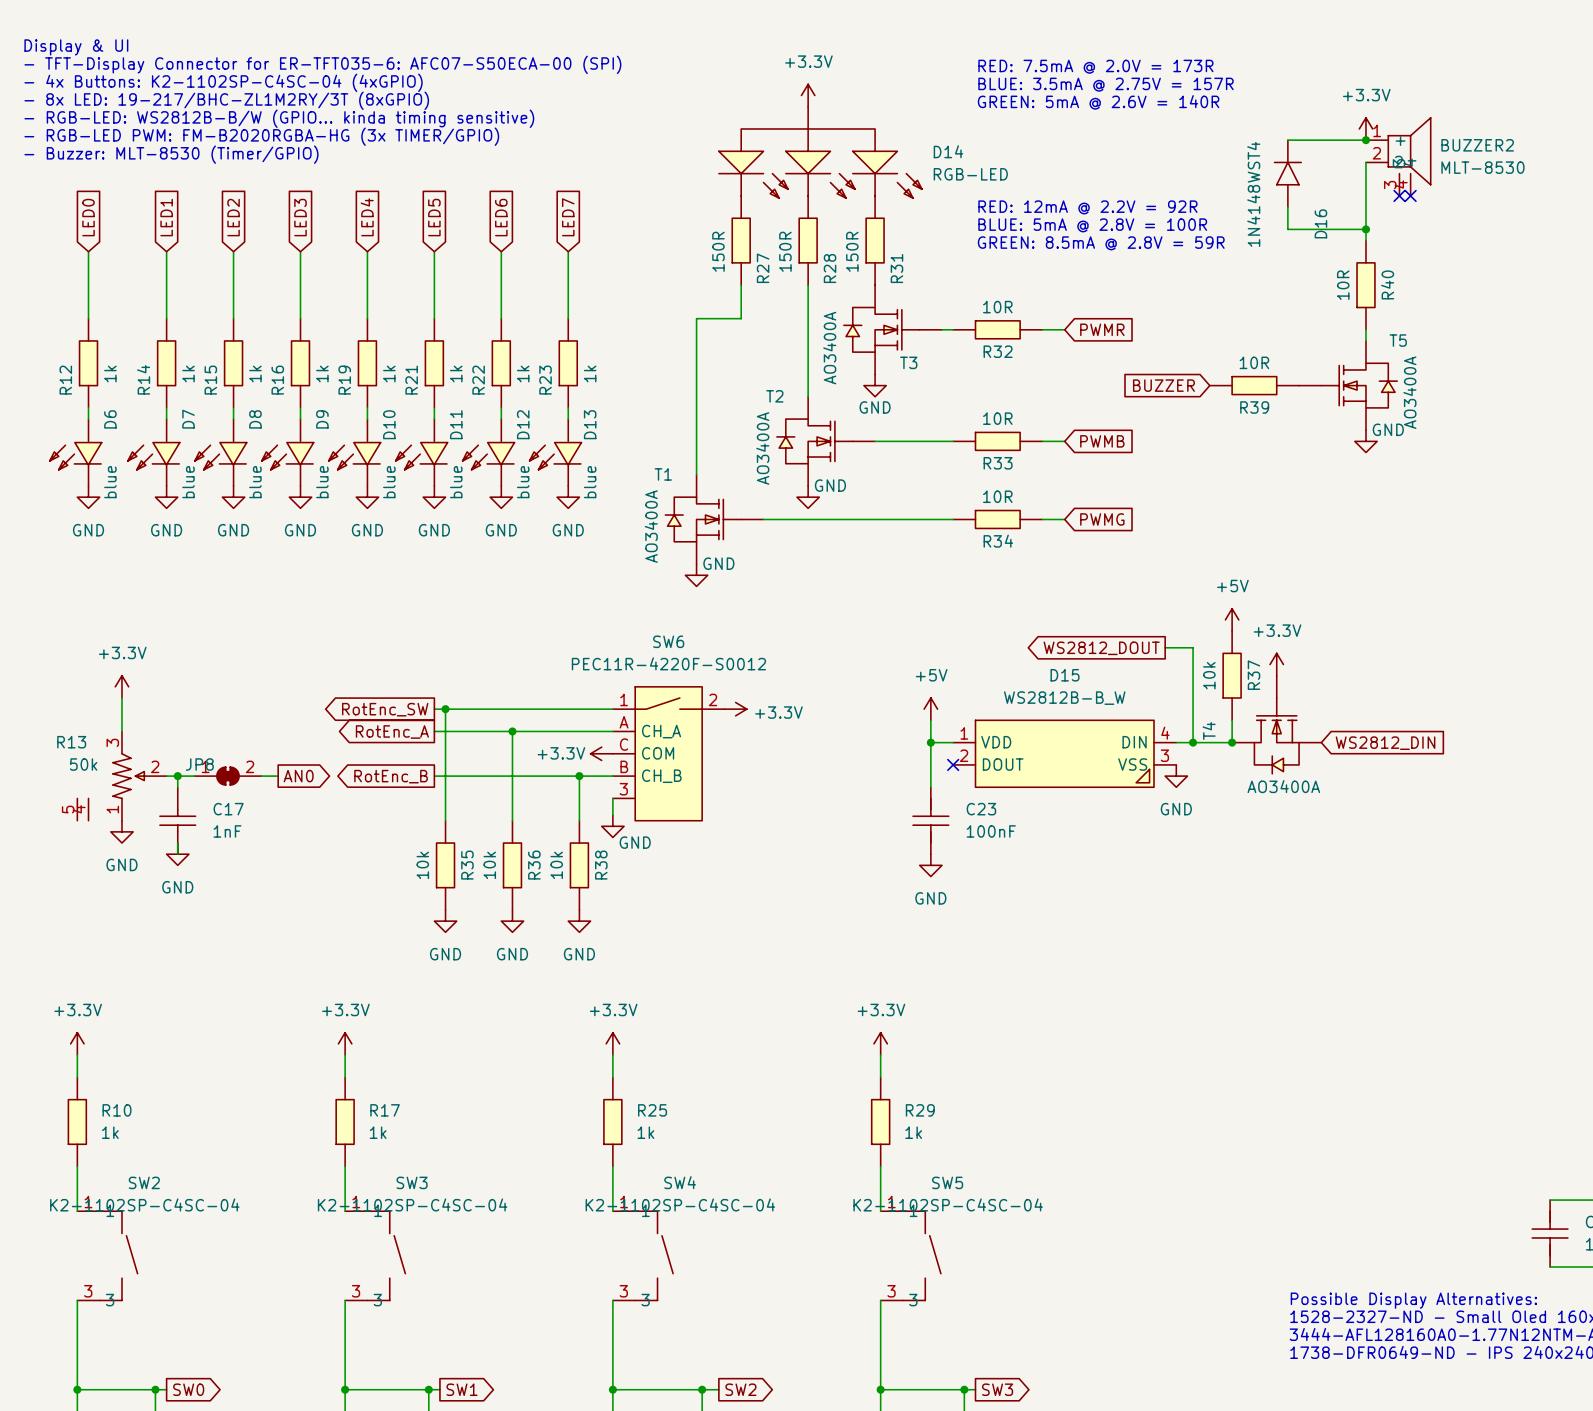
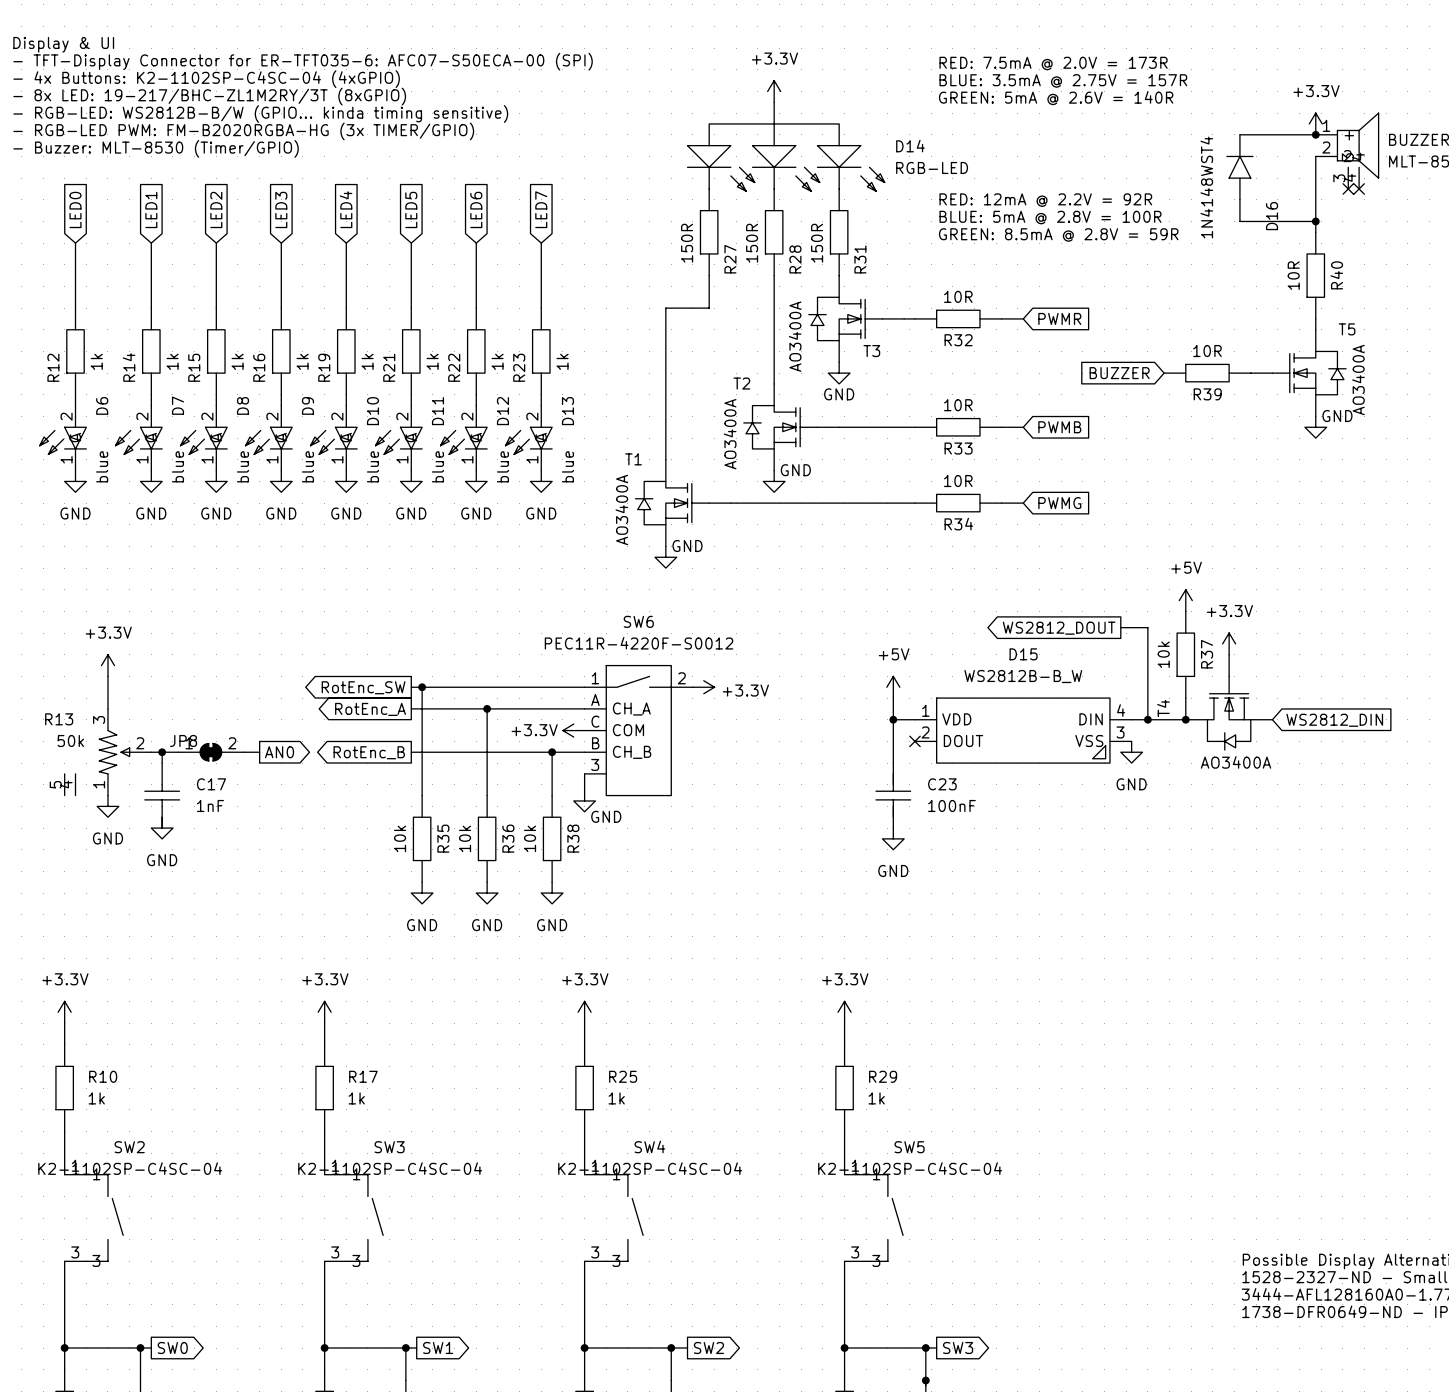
D6 symbol: [49, 419, 102, 487] -> [39, 405, 87, 471]
D7 symbol: [127, 419, 180, 487] -> [115, 405, 163, 471]
D8 symbol: [194, 419, 247, 487] -> [180, 405, 228, 471]
D9 symbol: [261, 419, 314, 487] -> [245, 405, 293, 471]
D10 symbol: [328, 419, 381, 487] -> [310, 405, 358, 471]
D11 symbol: [395, 419, 448, 487] -> [375, 405, 423, 471]
D12 symbol: [462, 419, 515, 487] -> [440, 405, 488, 471]
D13 symbol: [529, 419, 582, 487] -> [505, 405, 553, 471]

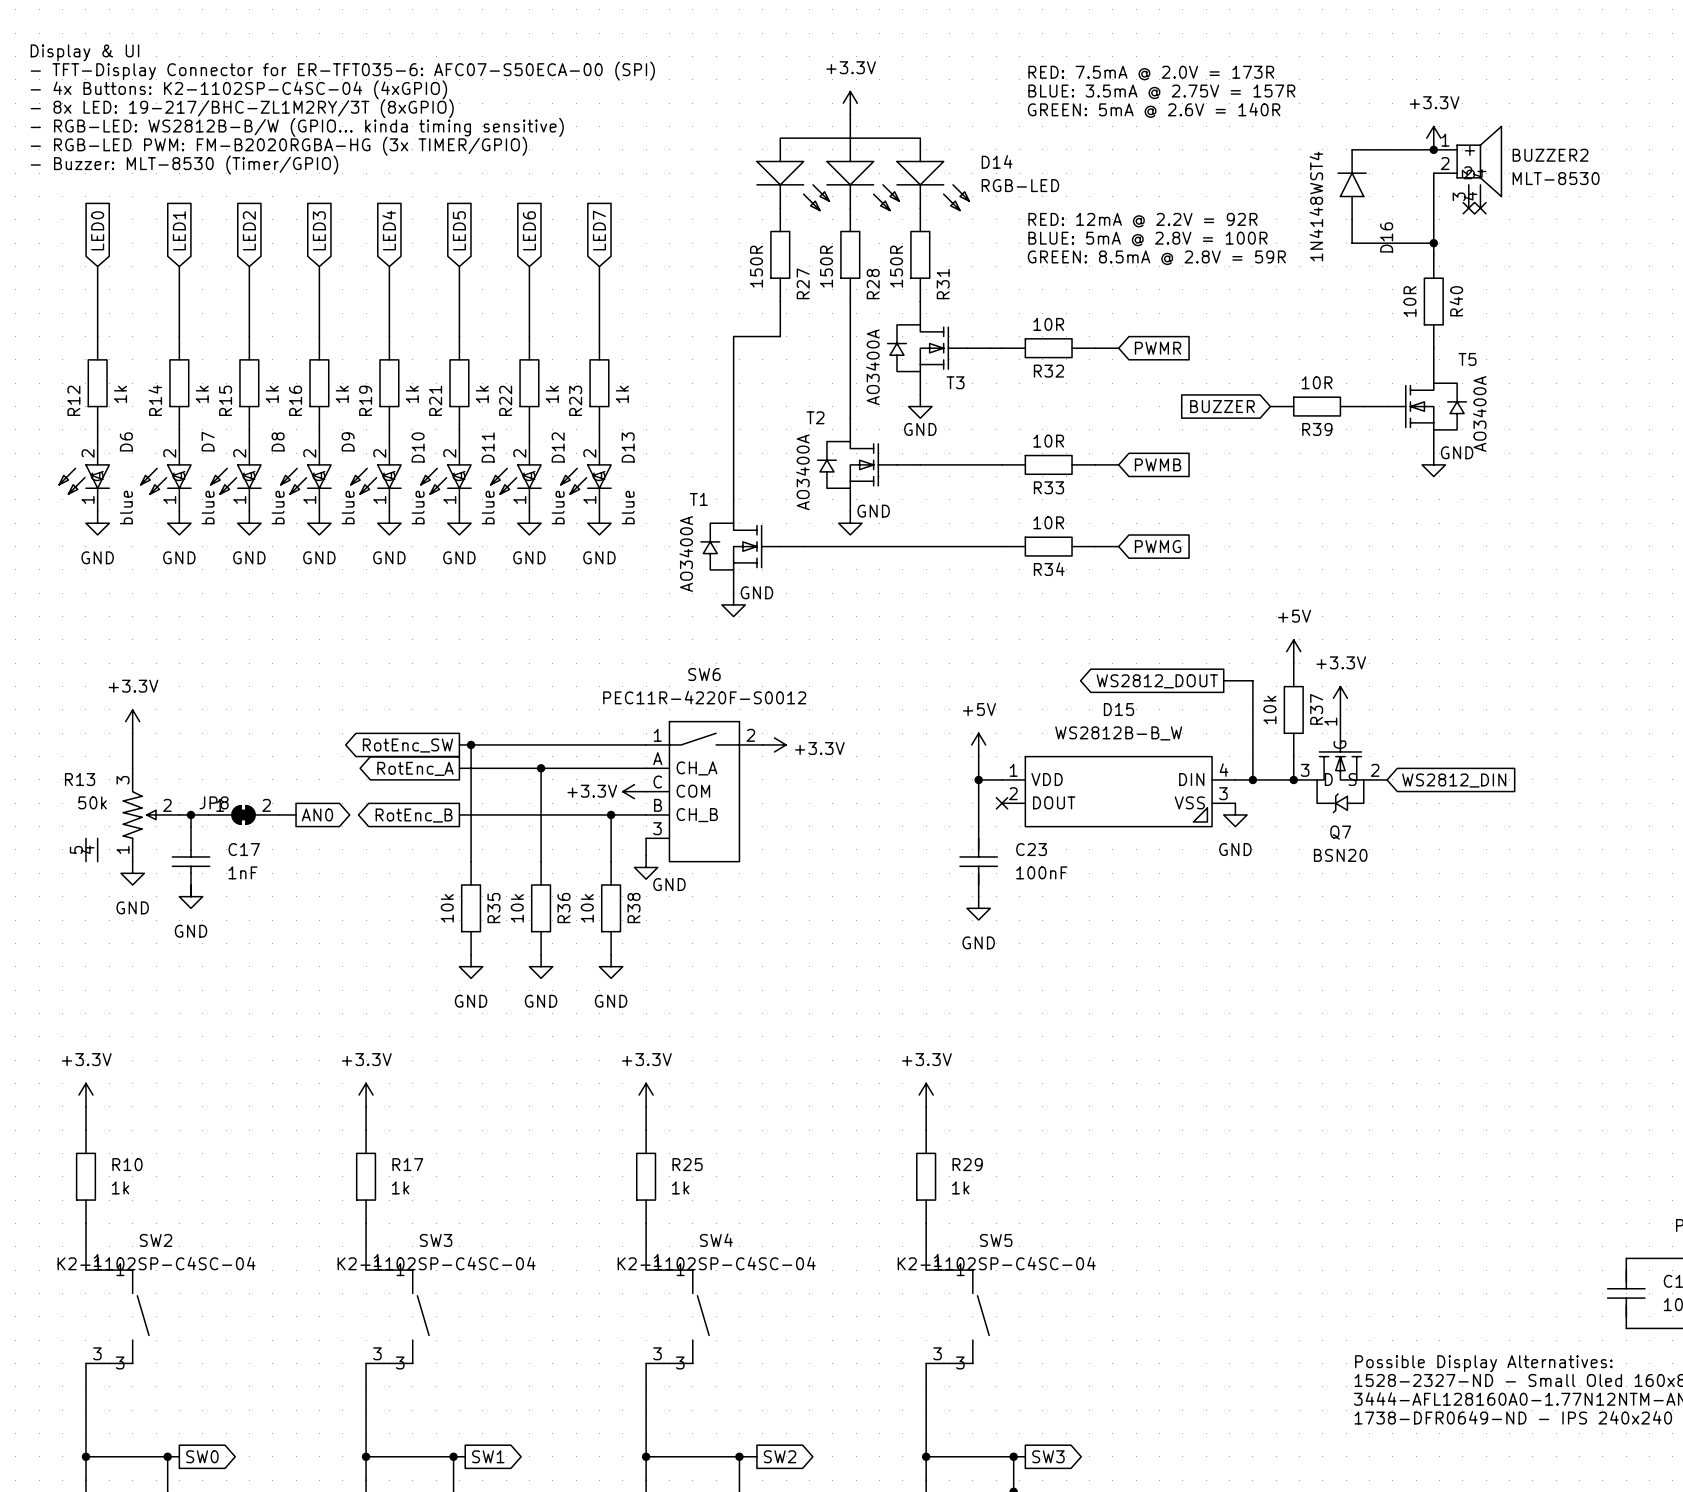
T4: AO3400A (1229, 702) -> none
Q7: none -> BSN20 (1340, 761)

